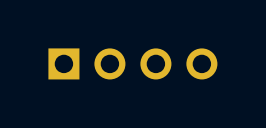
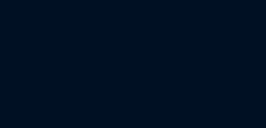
part: (132, 63) -> none

